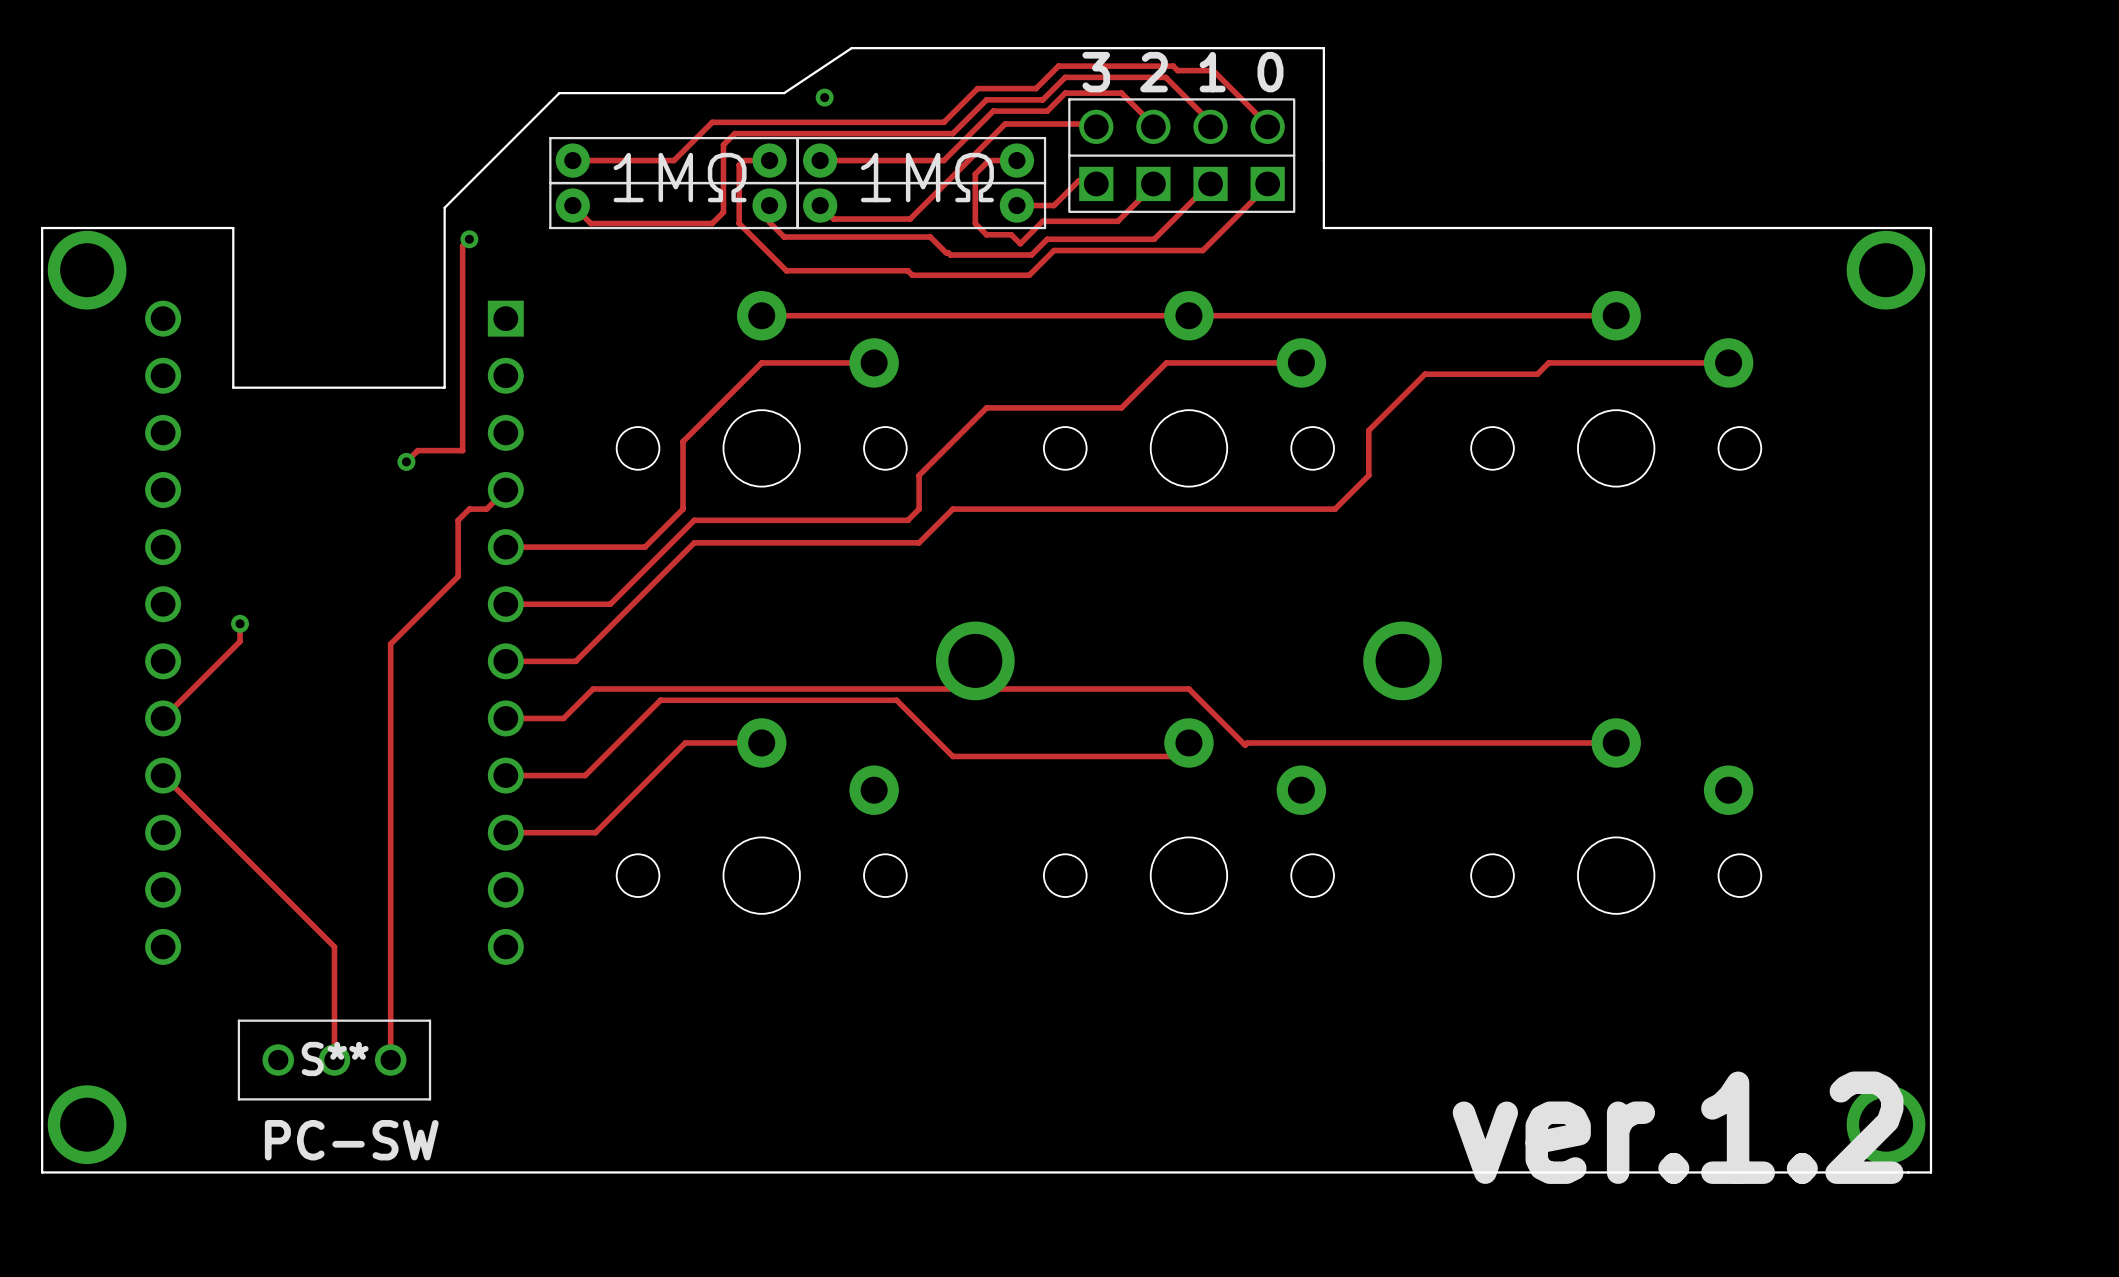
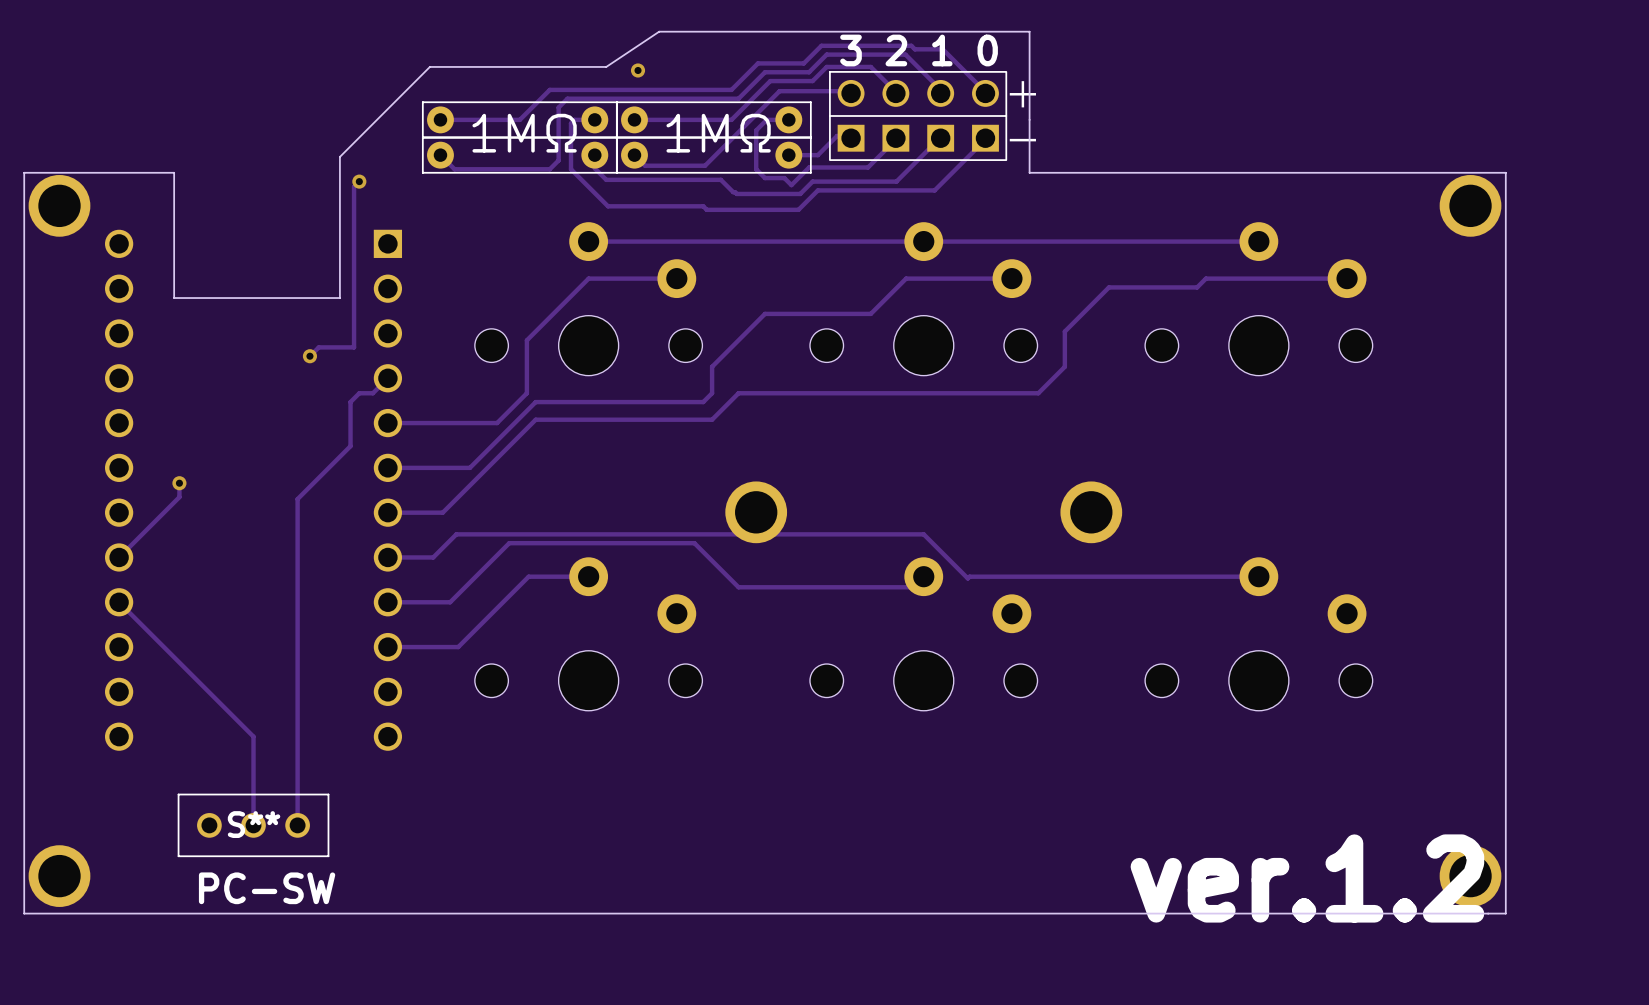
text: none -> ＋ (1022, 94)
text: none -> － (1022, 140)

